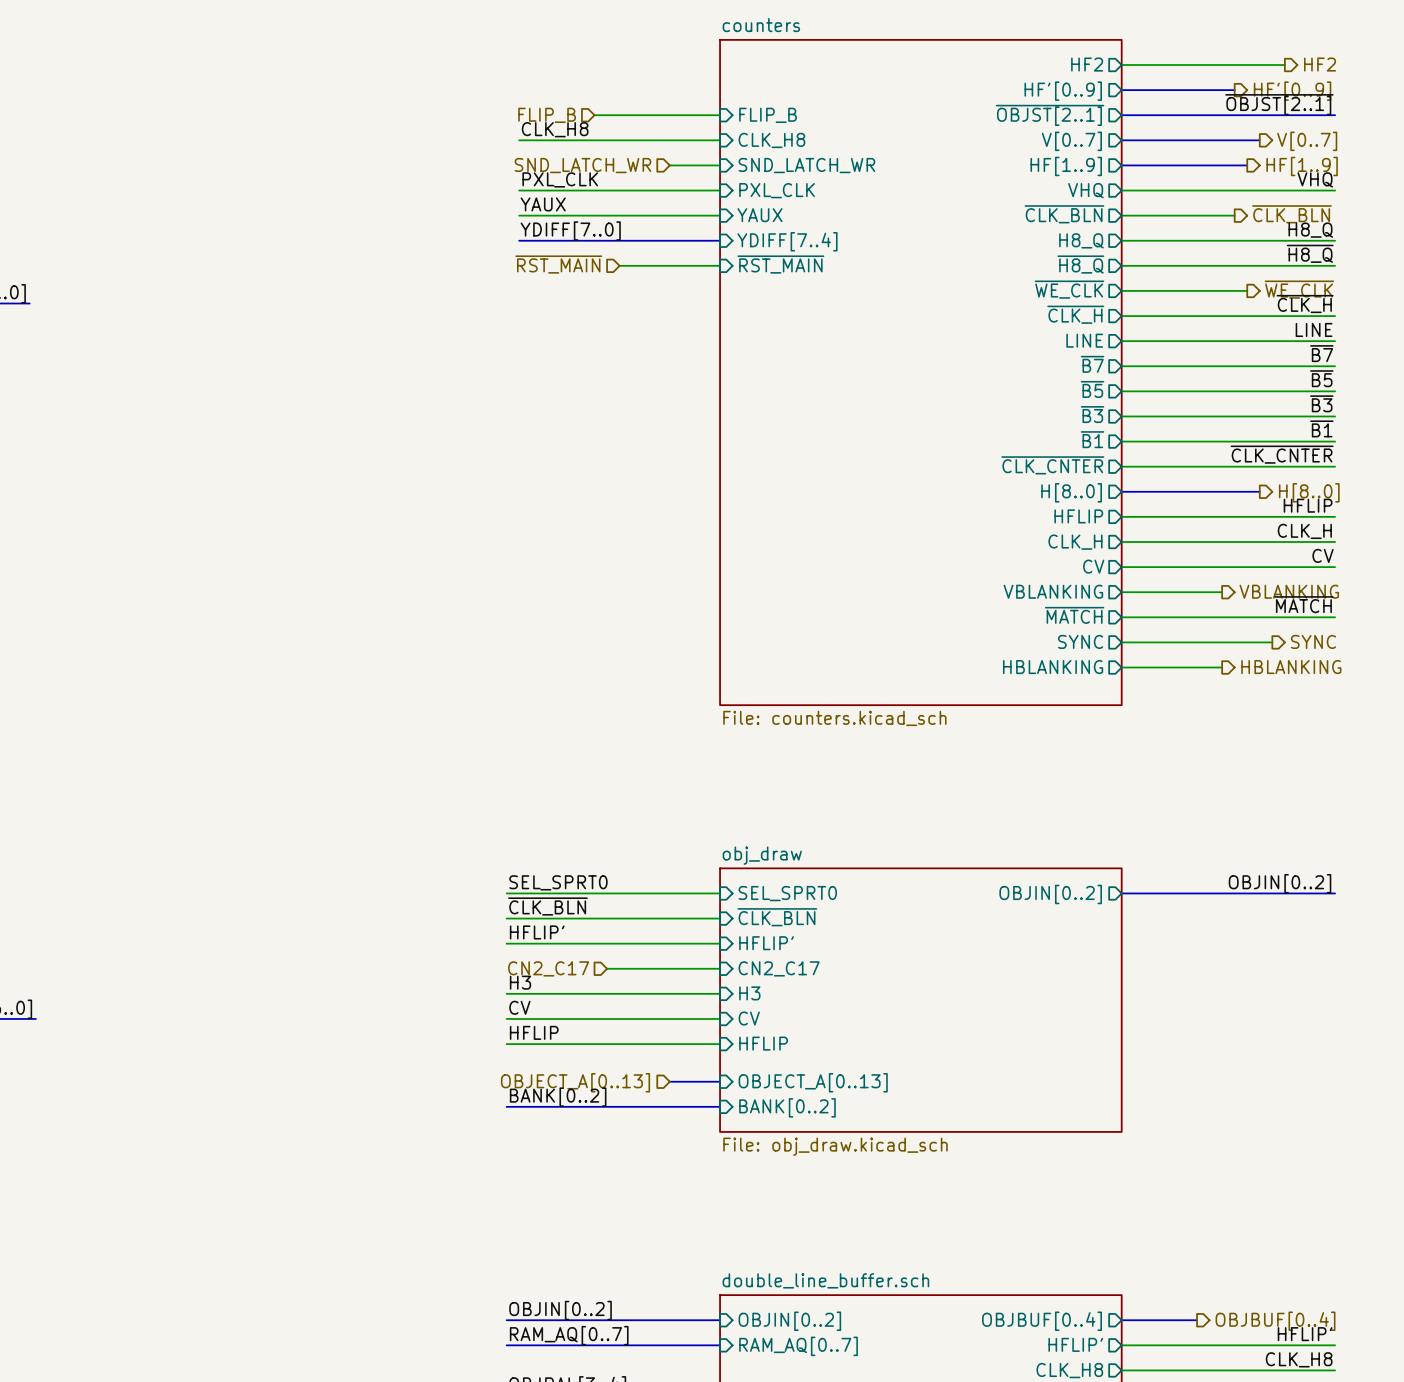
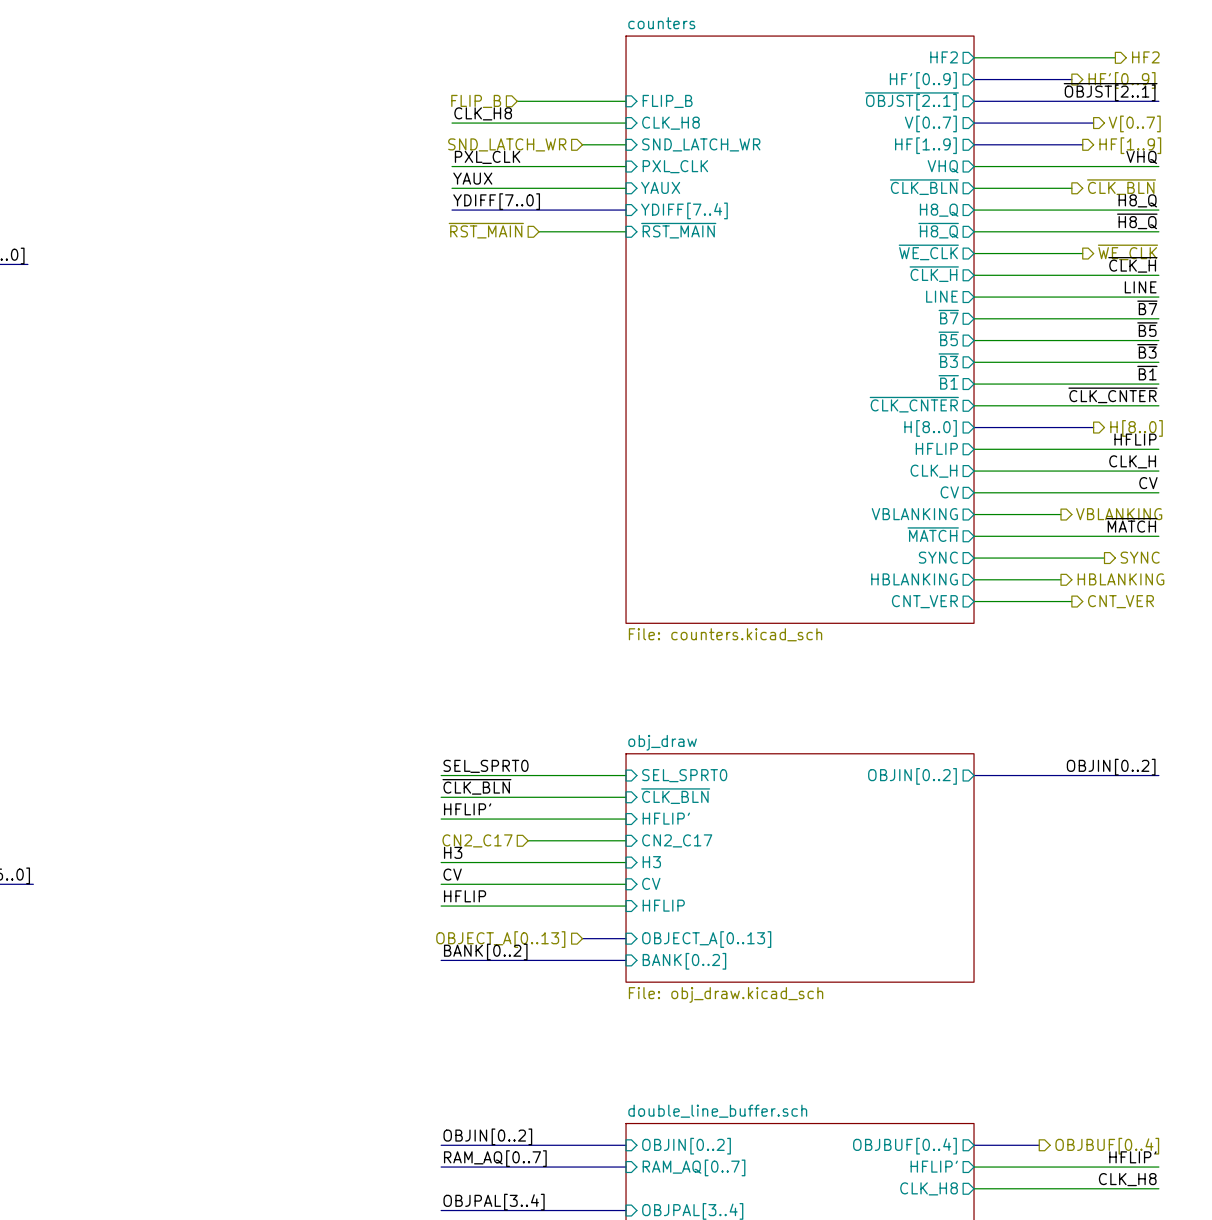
sheet counters shape: [720, 39, 1122, 706] -> [626, 36, 975, 624]
sheet pin: none -> CNT_VER (924, 601)
wire: none -> (974, 601) (1071, 601)
hierarchical label: none -> CNT_VER (1120, 601)

